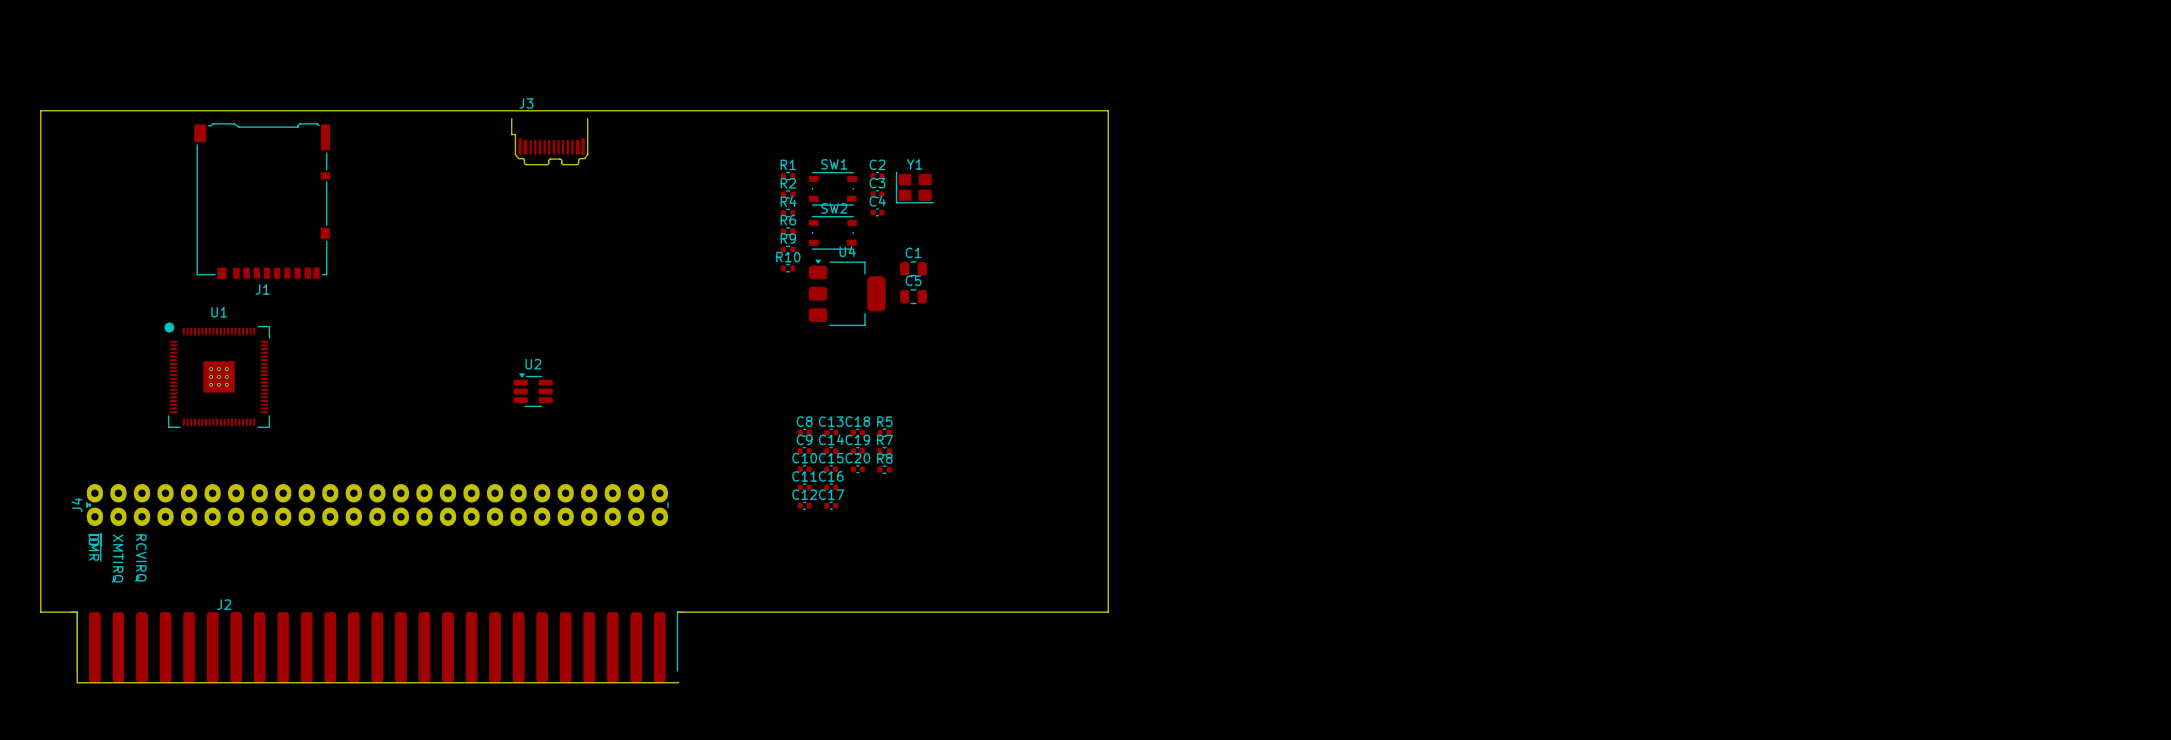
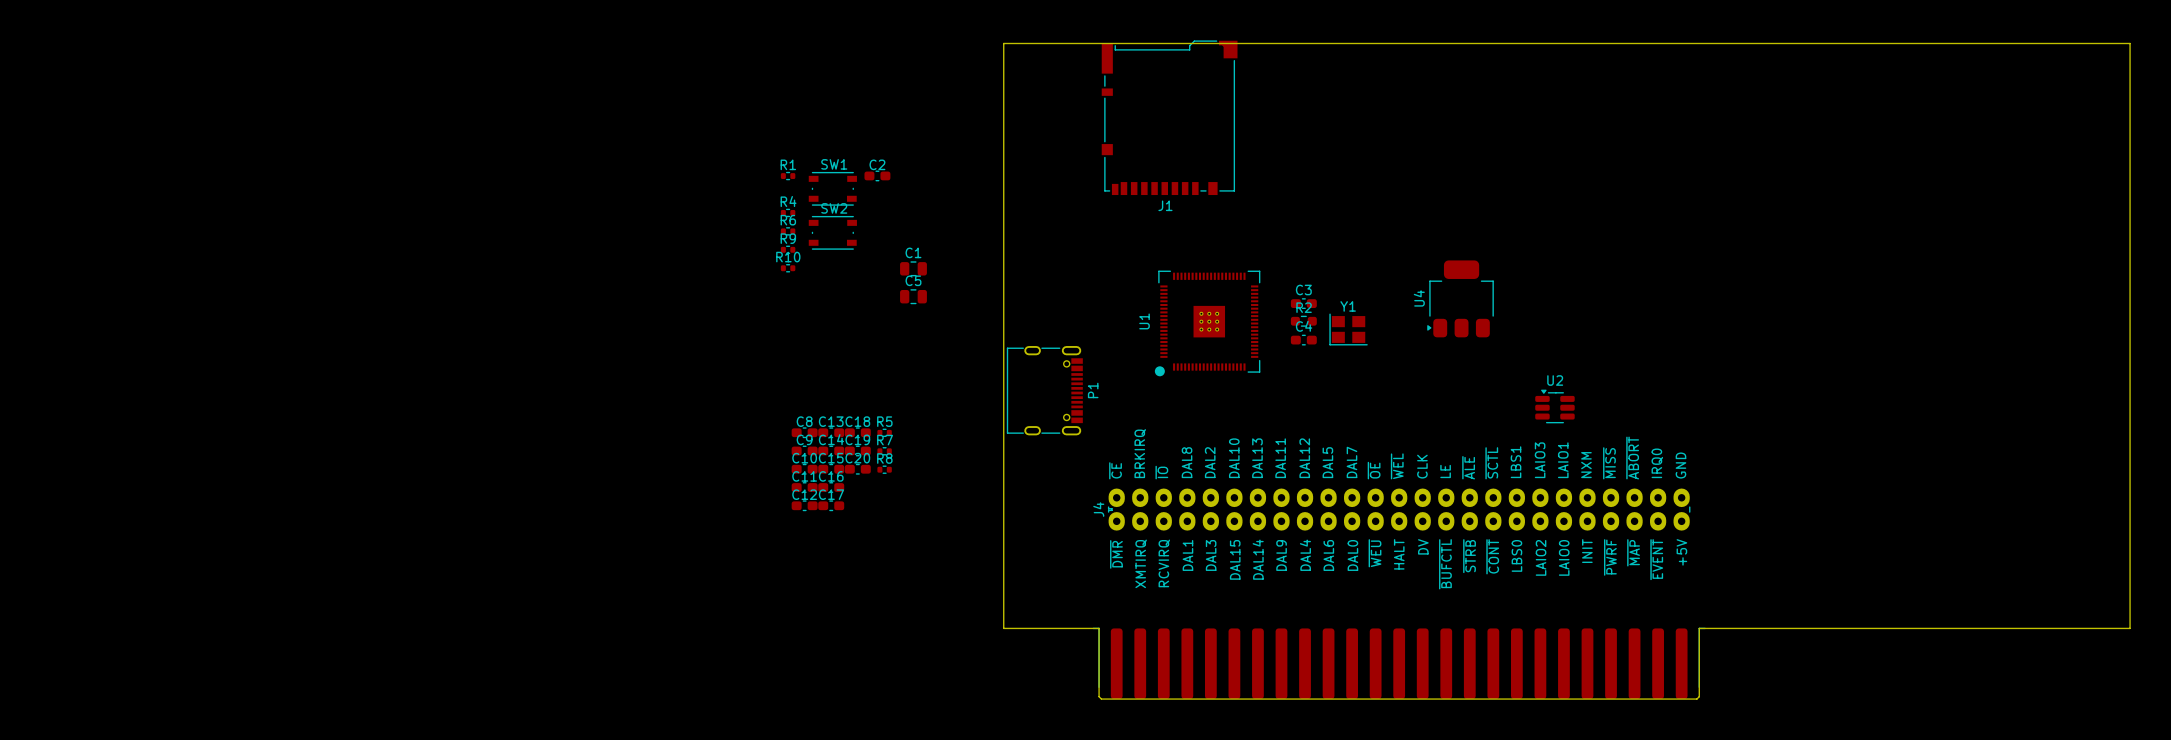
board edge: none -> (1003, 43) (1003, 628) (1099, 628) (1099, 696) (1101, 699) (1696, 699) (1699, 696) (1699, 628) (2130, 628) (2130, 43) (1003, 43)
J1 footprint: [194, 123, 330, 279] -> [1101, 40, 1238, 196]
J3: (549, 141) -> none
C2 footprint: [870, 172, 885, 180] -> [864, 170, 891, 182]
Y1 position: (915, 187) -> (1348, 329)
R2 footprint: [780, 190, 796, 199] -> [1290, 315, 1317, 327]
C3 footprint: [870, 190, 885, 199] -> [1290, 298, 1317, 309]
C4 footprint: [870, 208, 885, 217] -> [1290, 334, 1317, 346]
U4 rotation: 0° (847, 292) -> 90° counterclockwise (1460, 298)
U4 position: (847, 292) -> (1460, 298)
U1 rotation: 0° (217, 375) -> 90° counterclockwise (1207, 323)
U1 position: (217, 375) -> (1207, 323)
U2 position: (533, 390) -> (1554, 406)
P1: none -> (1044, 390)
C8 footprint: [797, 428, 812, 437] -> [791, 427, 818, 439]
C13 footprint: [824, 428, 839, 437] -> [818, 427, 845, 439]
C18 footprint: [850, 428, 865, 437] -> [844, 427, 871, 439]
C9 footprint: [797, 447, 812, 455] -> [791, 445, 818, 457]
C14 footprint: [824, 447, 839, 455] -> [818, 445, 845, 457]
C19 footprint: [850, 447, 865, 455] -> [844, 445, 871, 457]
C10 footprint: [797, 465, 812, 474] -> [791, 463, 818, 475]
C15 footprint: [824, 465, 839, 474] -> [818, 463, 845, 475]
C20 footprint: [850, 465, 865, 474] -> [844, 463, 871, 475]
J4 footprint: [86, 483, 669, 527] -> [1108, 488, 1691, 531]
C11 footprint: [797, 483, 812, 492] -> [791, 482, 818, 493]
C16 footprint: [824, 483, 839, 492] -> [818, 482, 845, 493]
C12 footprint: [797, 501, 812, 510] -> [791, 500, 818, 512]
C17 footprint: [824, 501, 839, 510] -> [818, 500, 845, 512]
board edge: (677, 612) (1108, 612) (1108, 110) (40, 110) (40, 612) (77, 612) (77, 682) (678, 682) -> none
J2: (377, 647) -> none
part: none -> (1399, 663)

